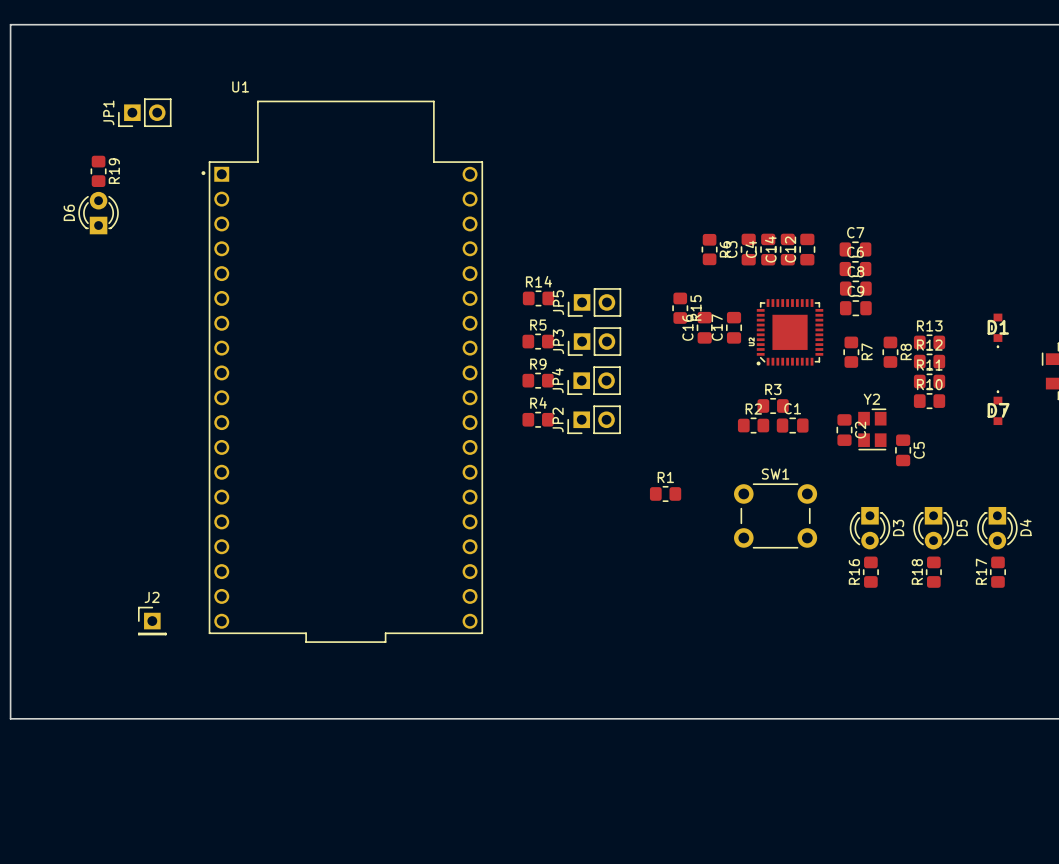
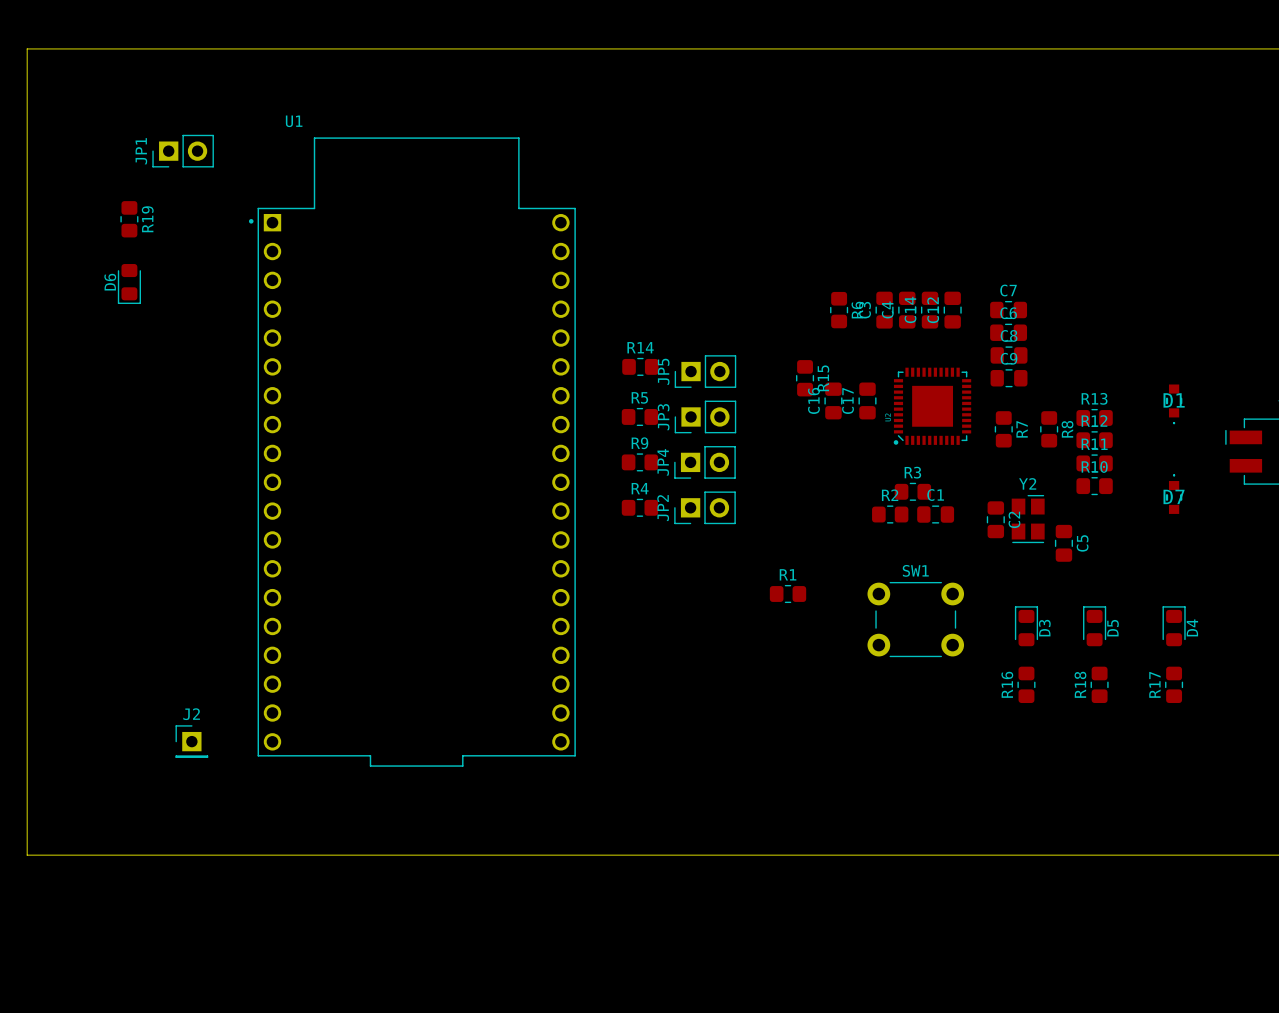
D6 footprint: [78, 191, 119, 235] -> [117, 264, 141, 304]
D3 footprint: [849, 506, 891, 550] -> [1014, 606, 1039, 647]
D5 footprint: [913, 506, 954, 550] -> [1083, 606, 1107, 647]
D4 footprint: [977, 506, 1018, 550] -> [1162, 606, 1186, 647]

